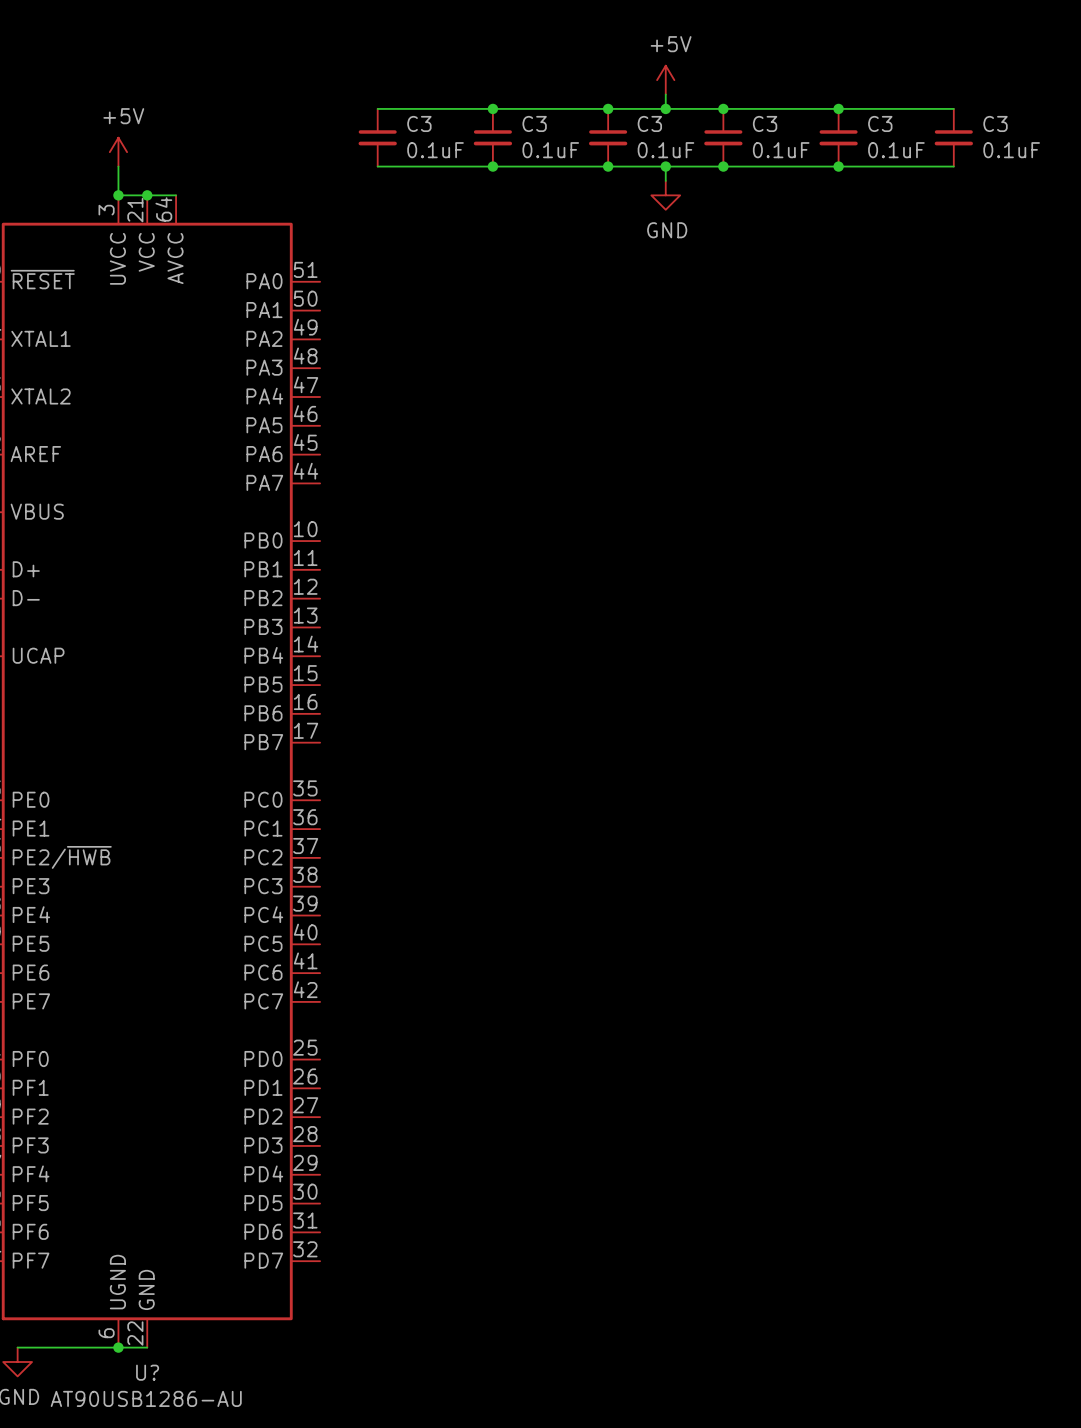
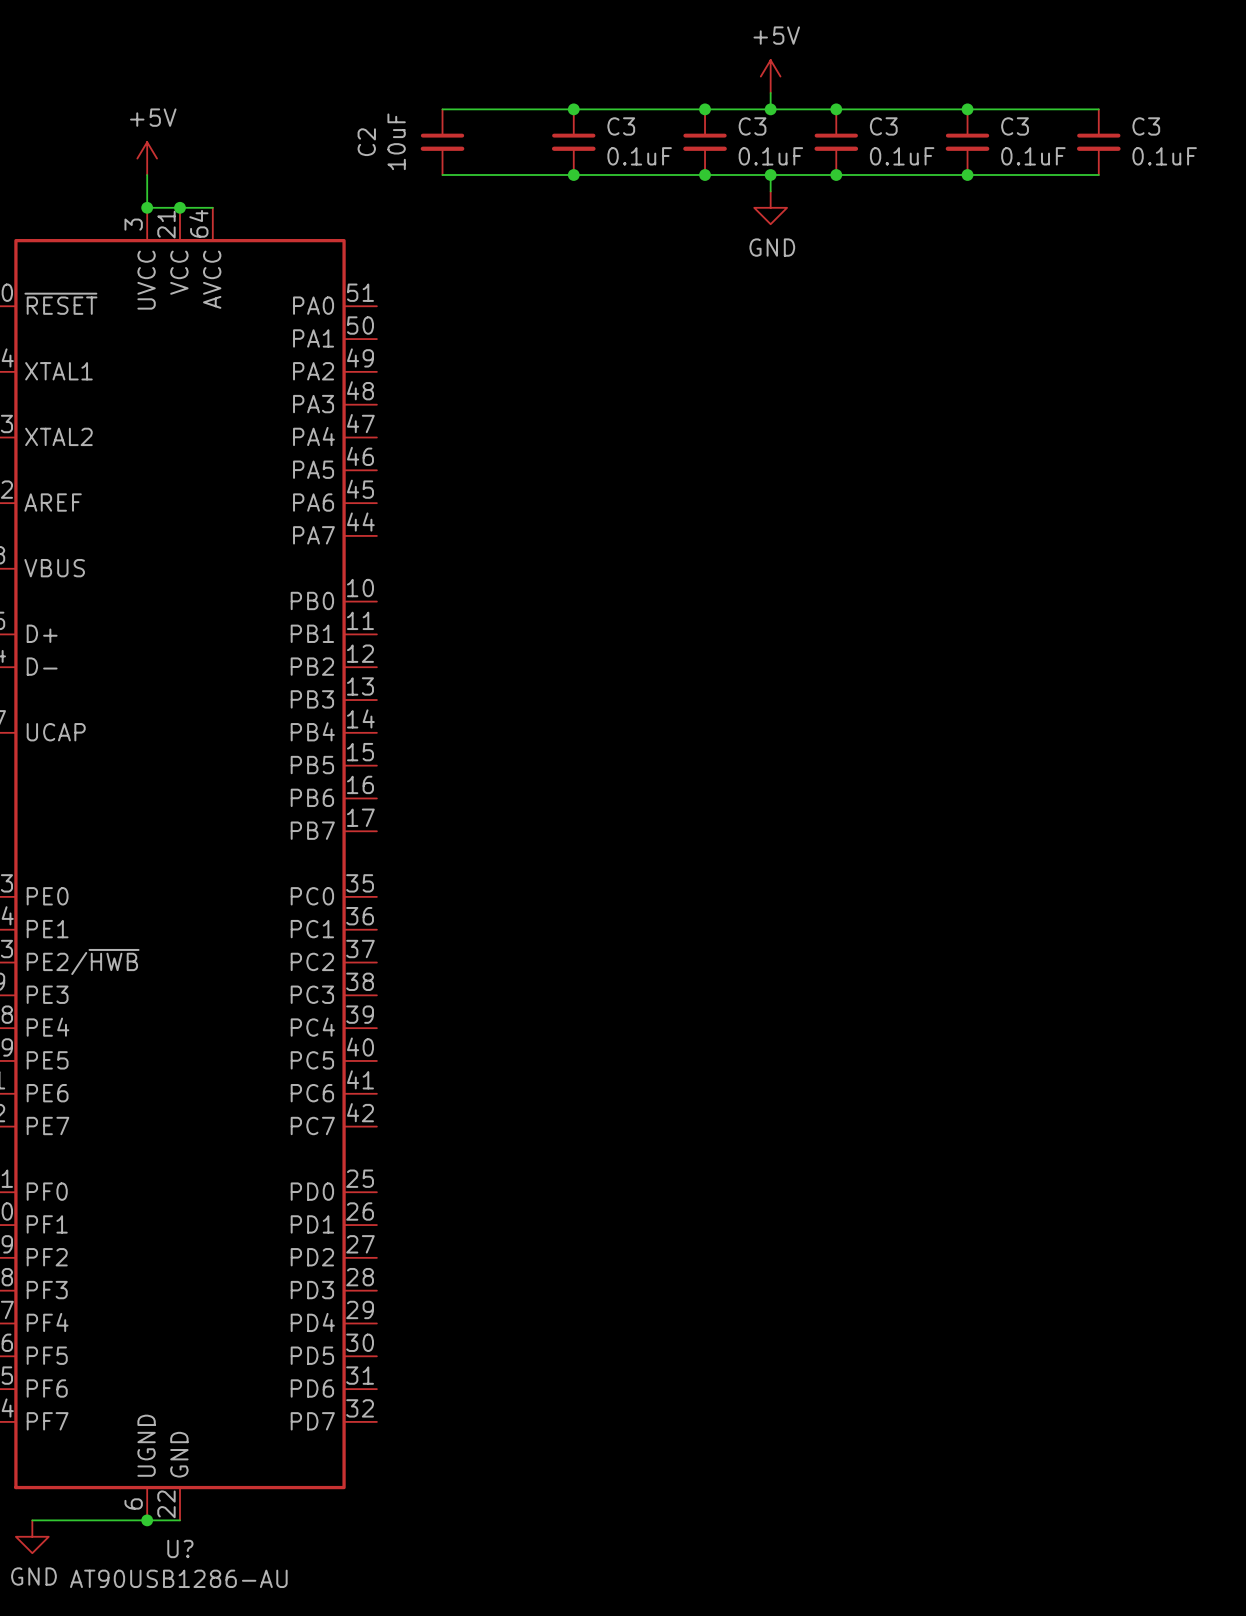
C3 name: C3 (419, 123) -> C2 (366, 142)
C3 value: 0.1uF (435, 150) -> 10uF (396, 141)

